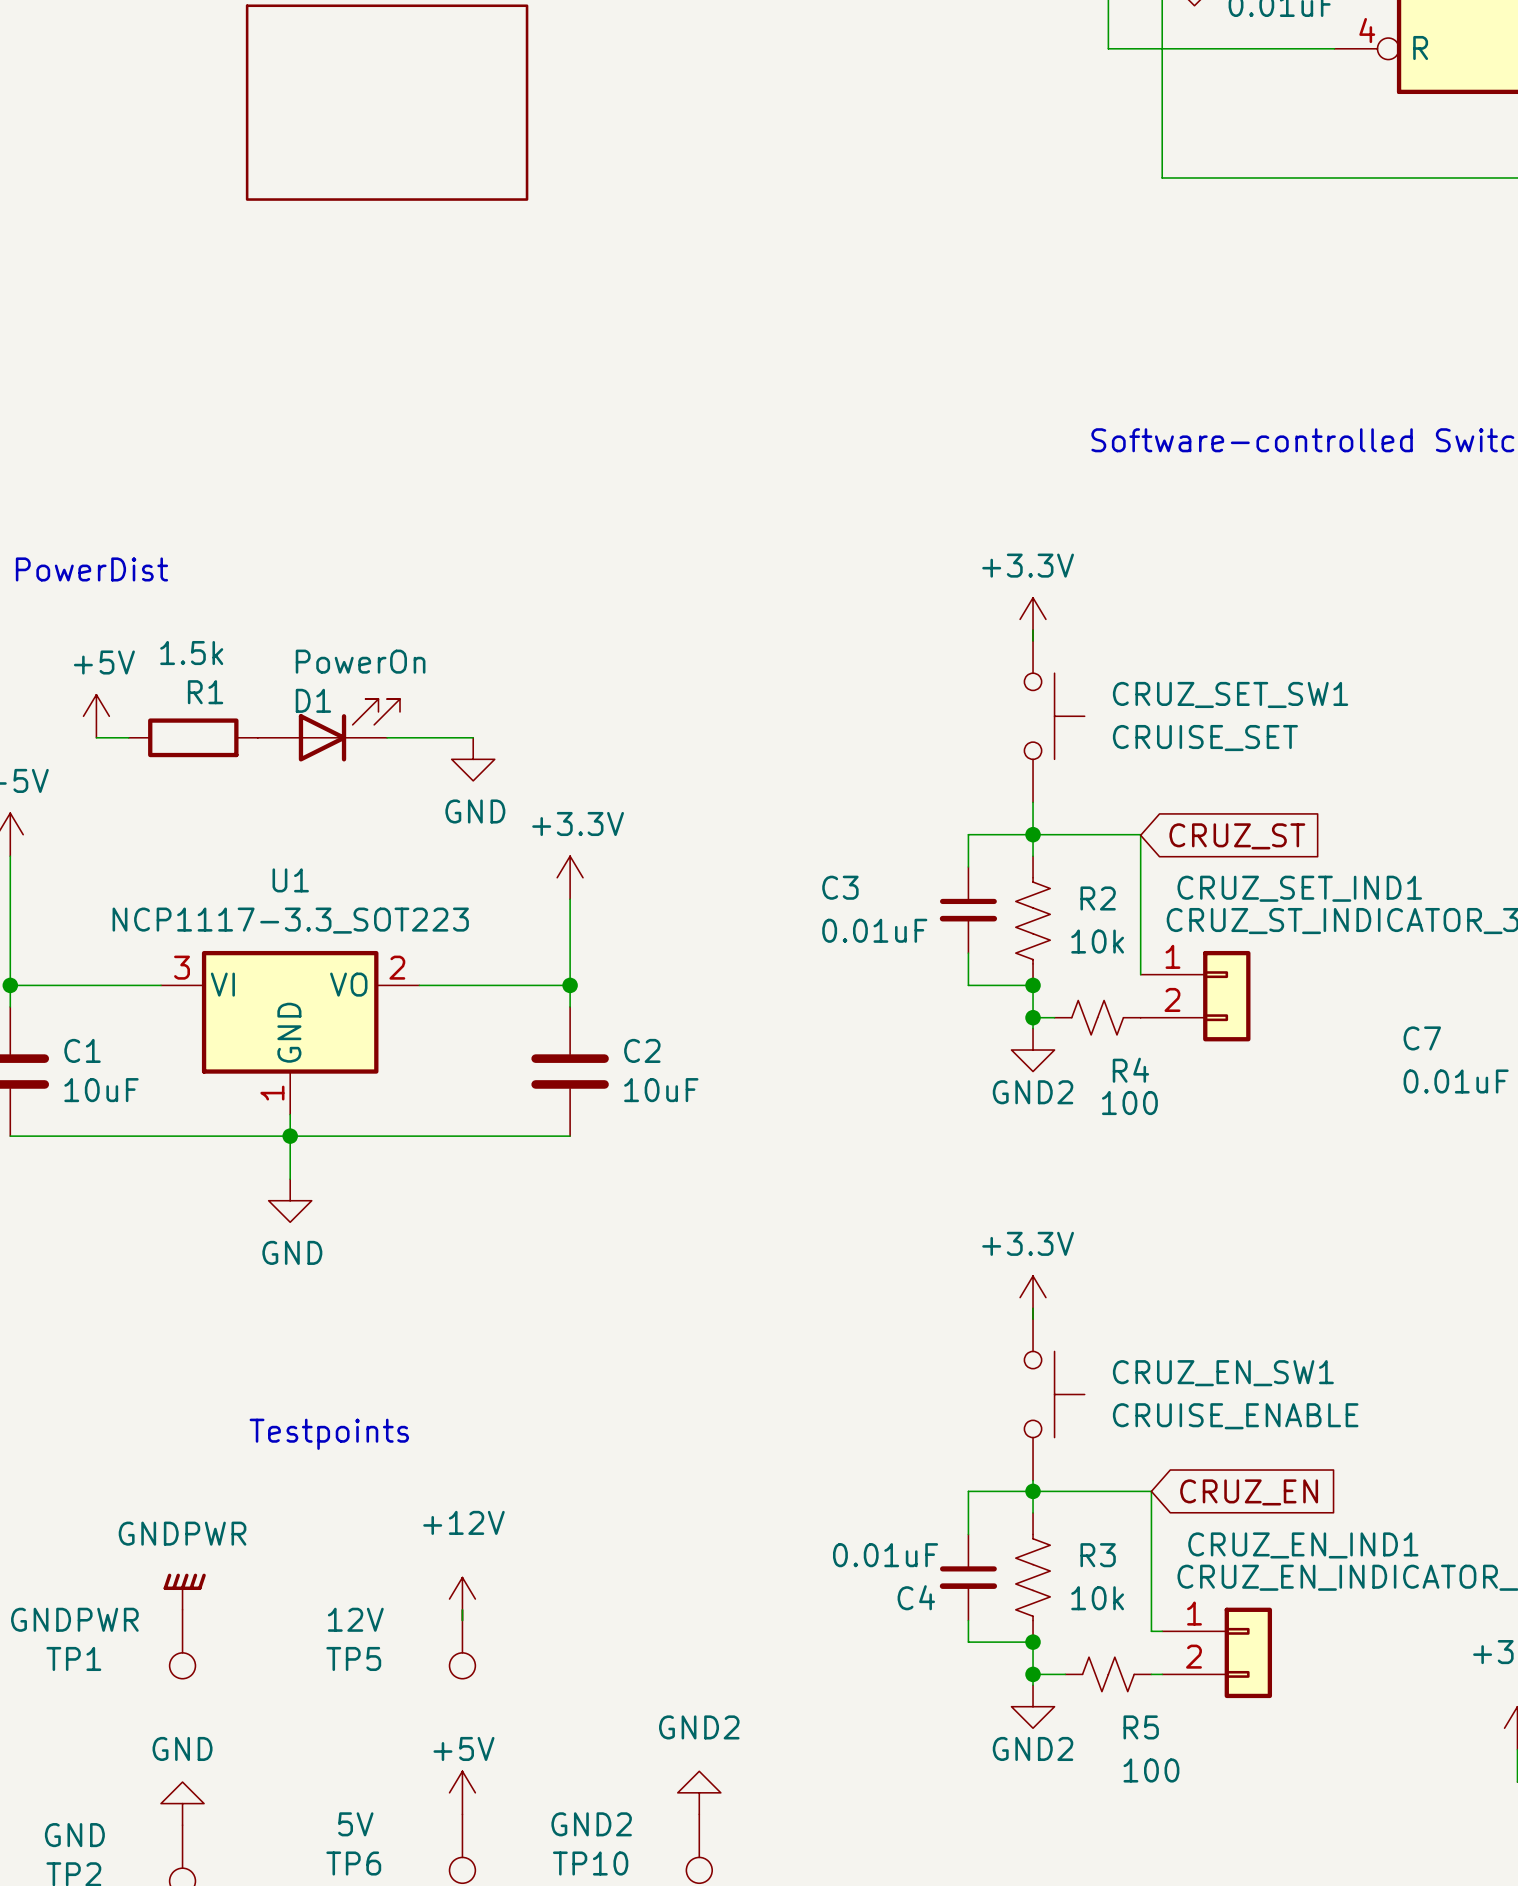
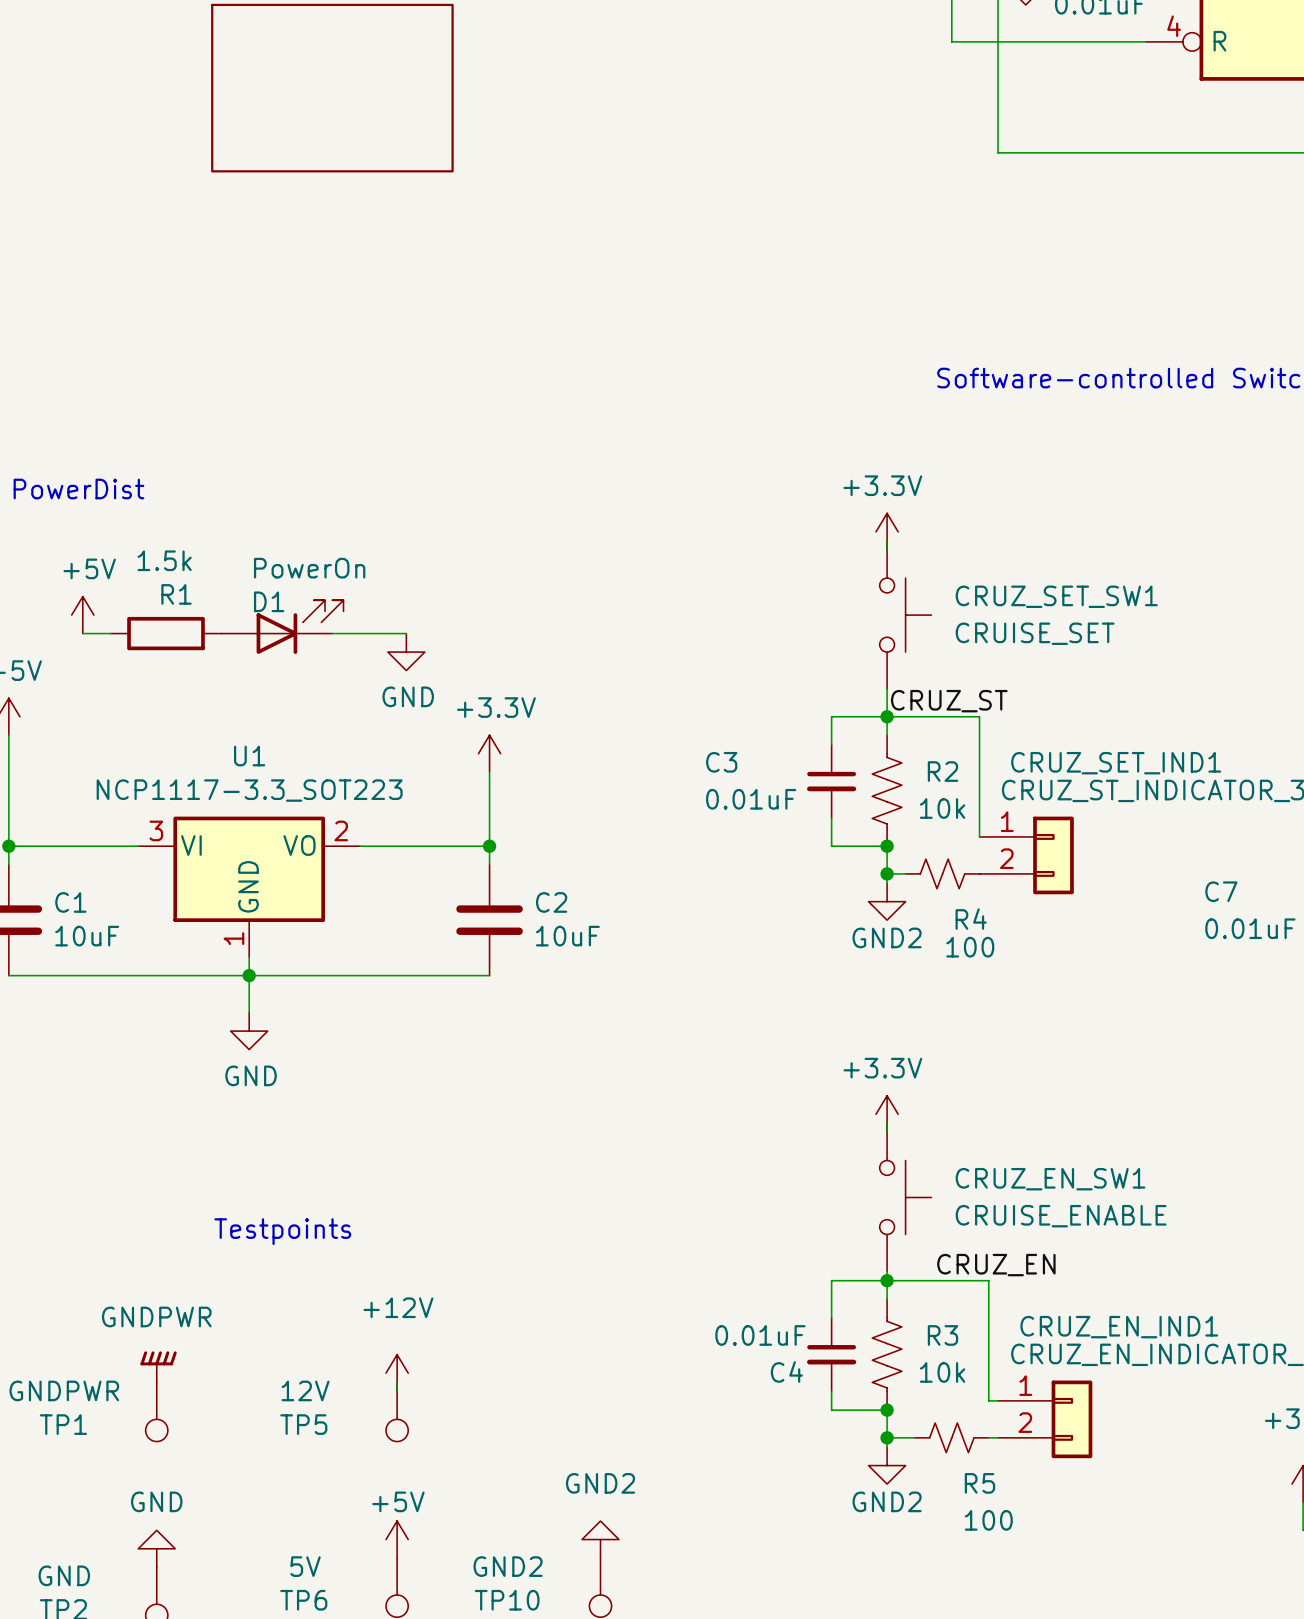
label: none -> CRUZ_ST (949, 701)
global label: CRUZ_ST (1237, 836) -> none
label: none -> CRUZ_EN (996, 1265)
global label: CRUZ_EN (1249, 1492) -> none

